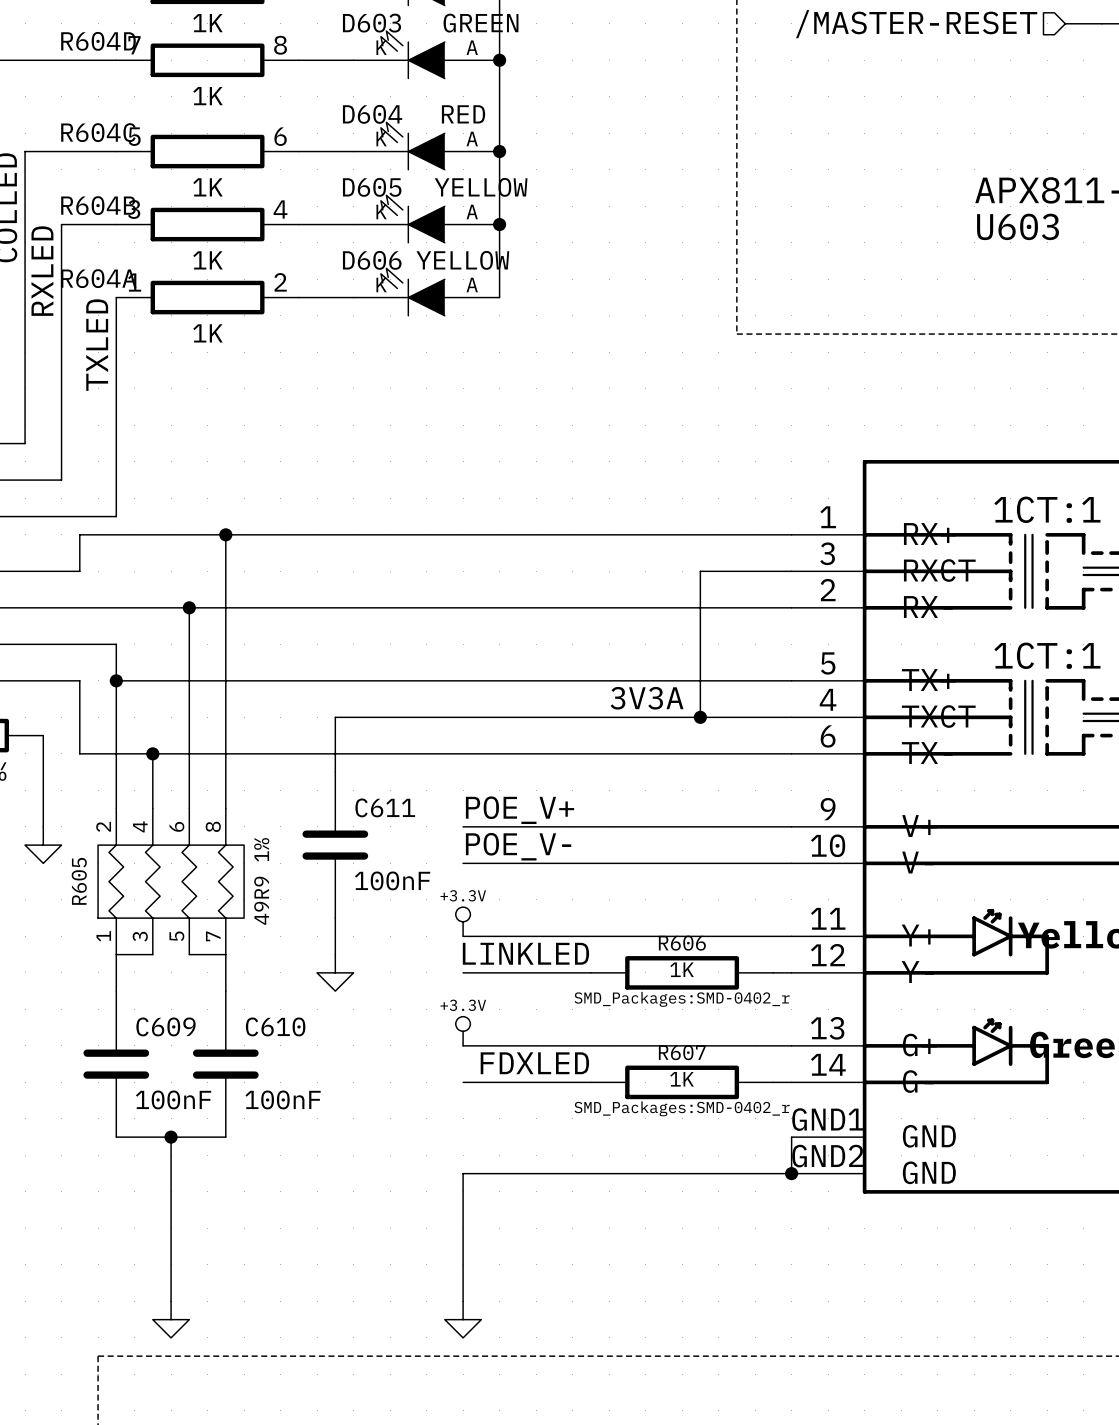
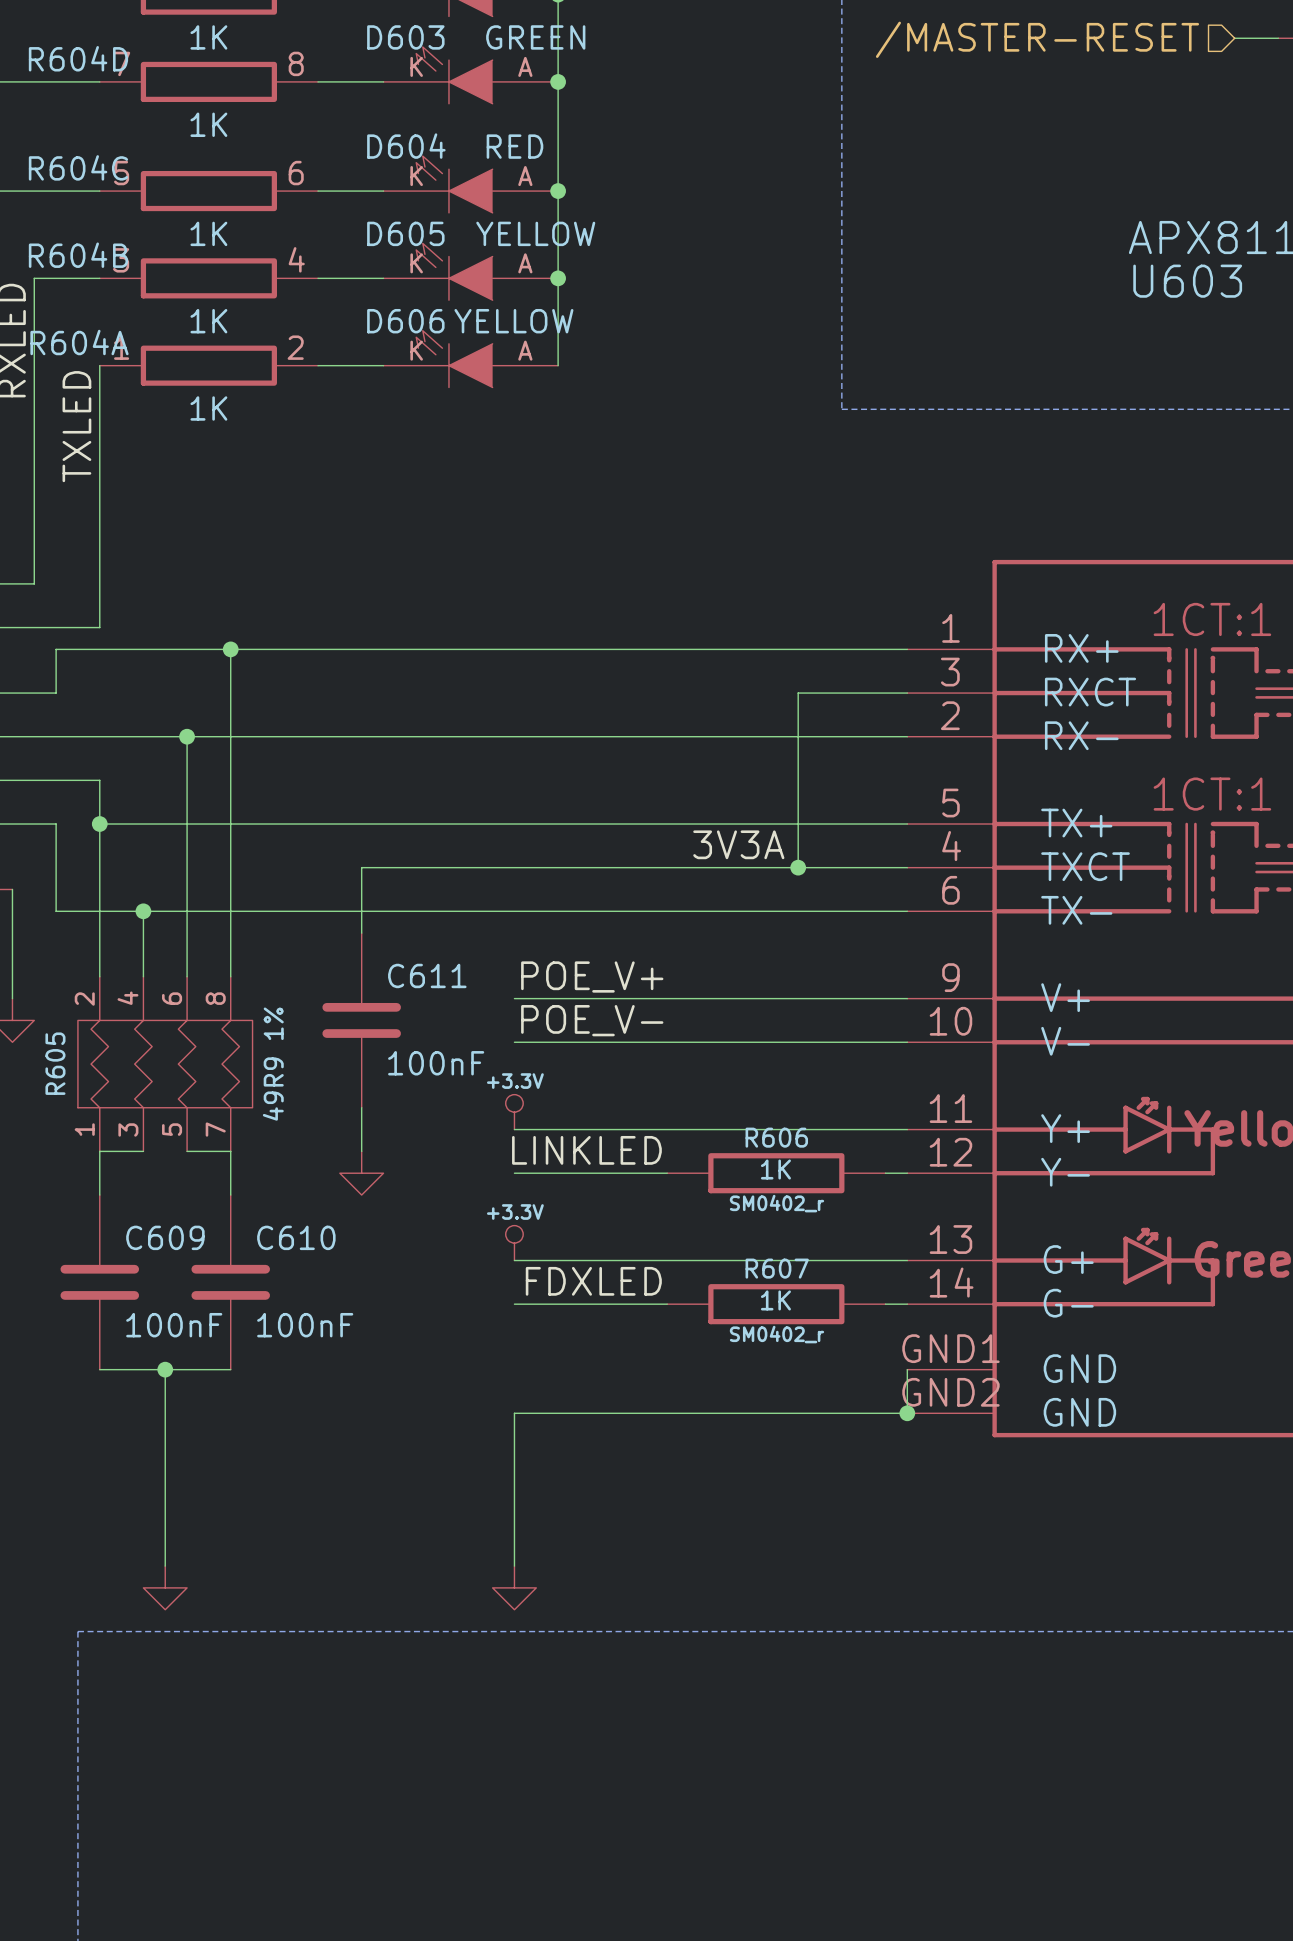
R606 text: SMD_Packages:SMD-0402_r (682, 999) -> SM0402_r (776, 1203)
R607 text: SMD_Packages:SMD-0402_r (682, 1108) -> SM0402_r (776, 1334)

